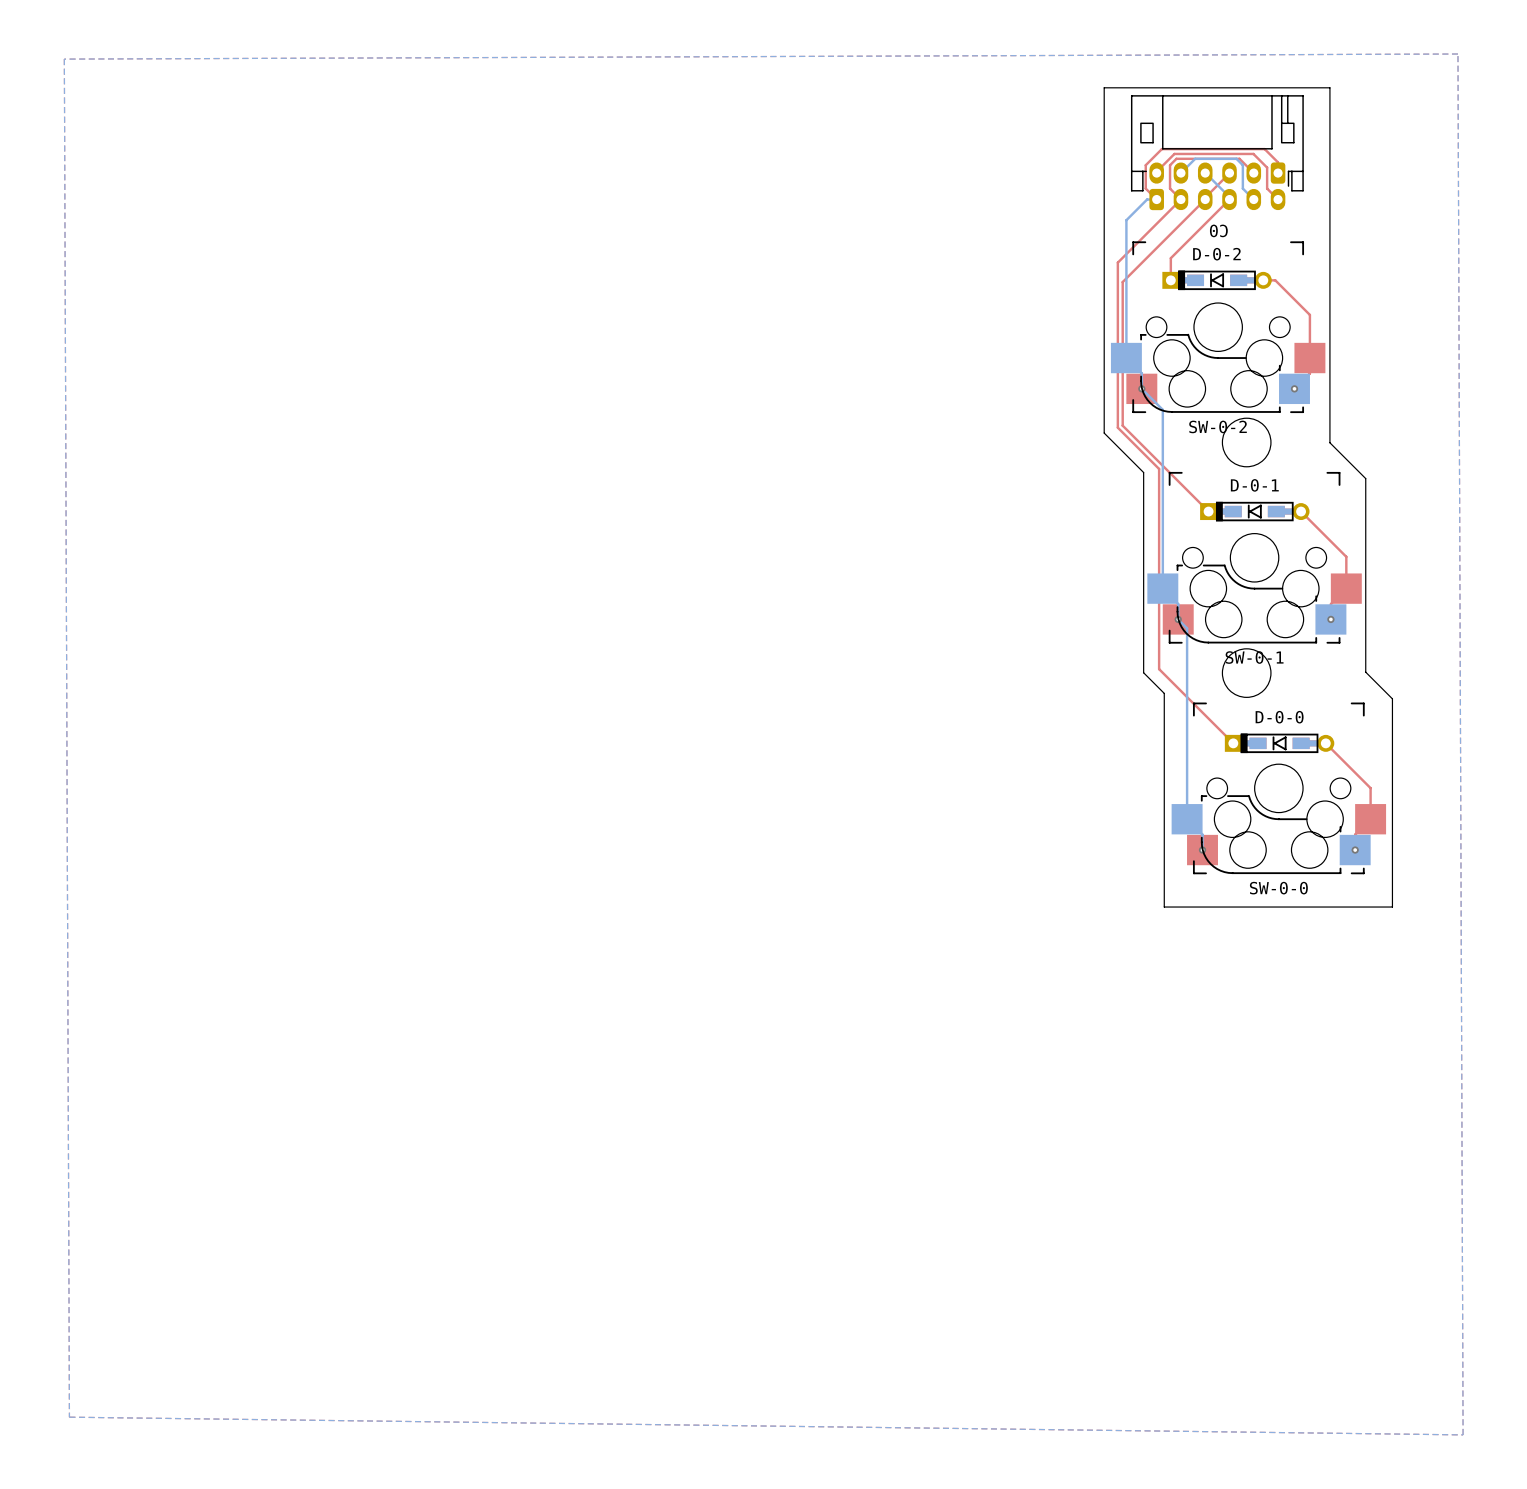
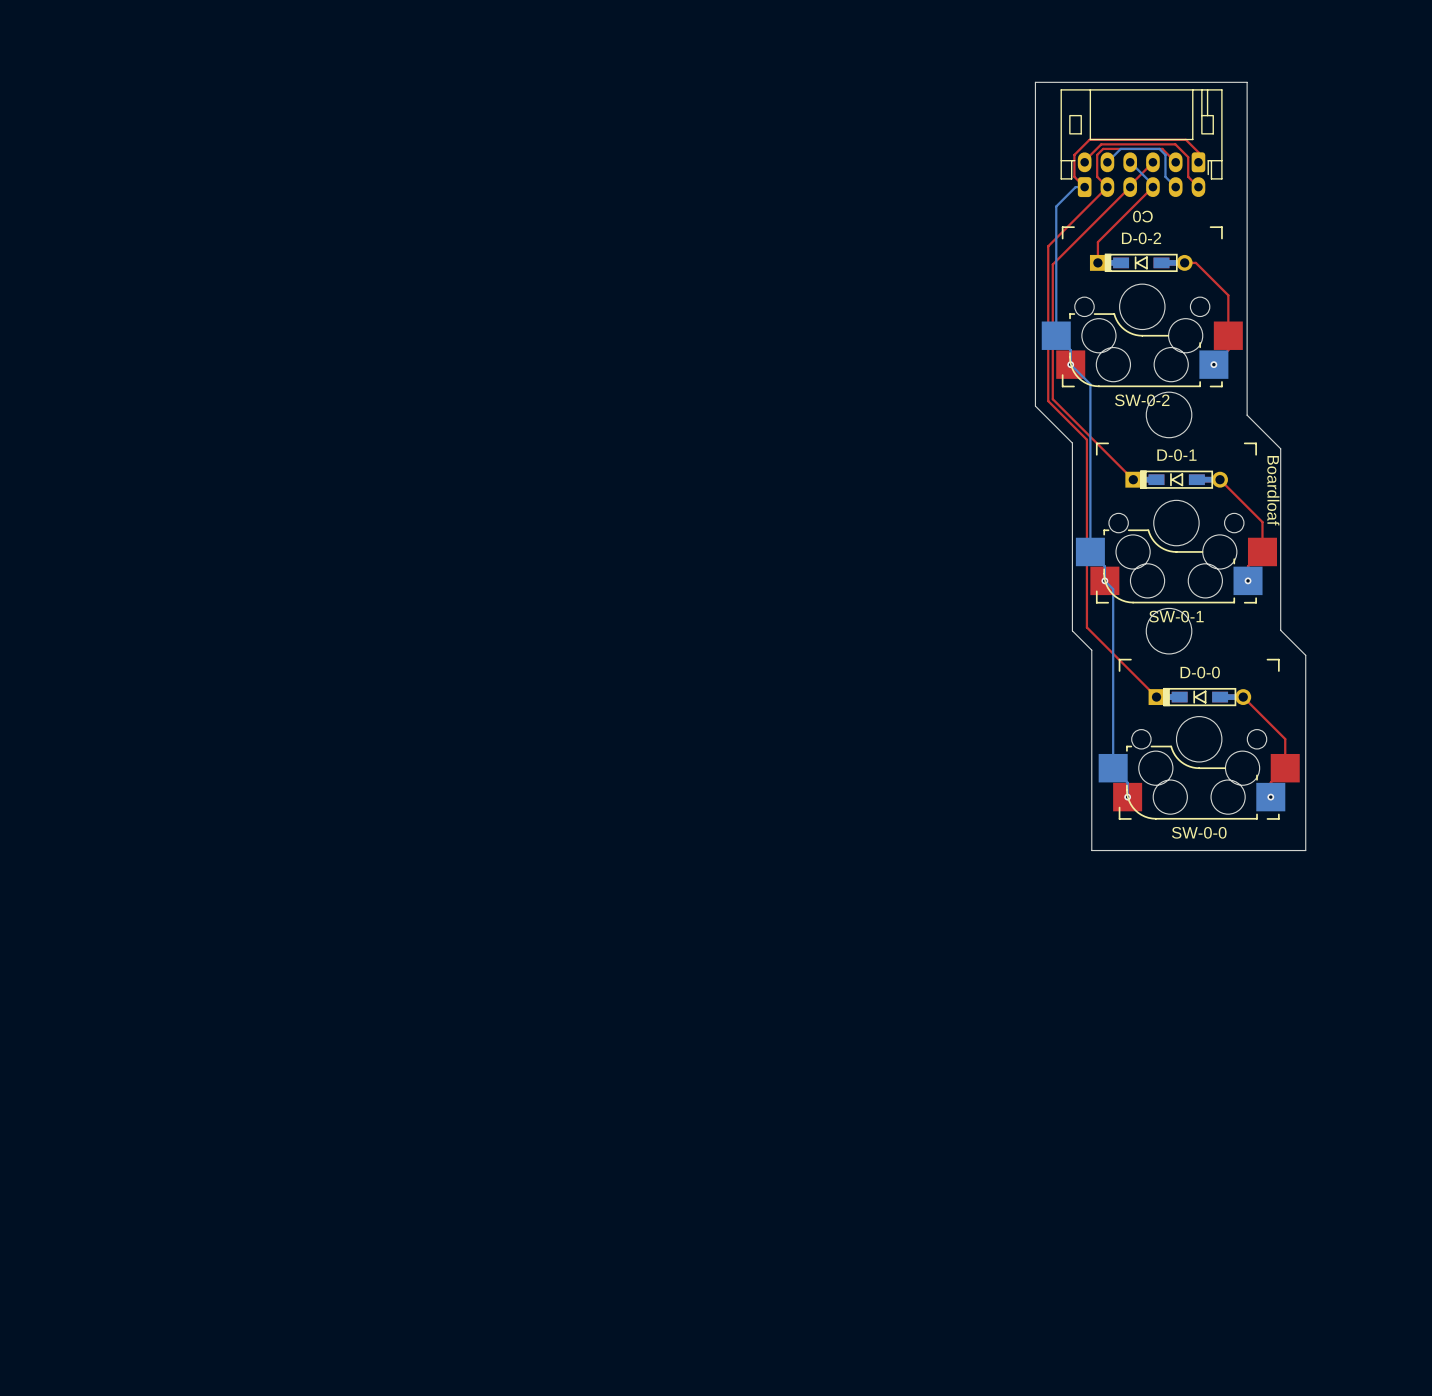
bottom zone outline: (1457, 54) (64, 59) (69, 1417) (1463, 1434) (1457, 54) -> none
text: none -> Boardloaf (1273, 490)

